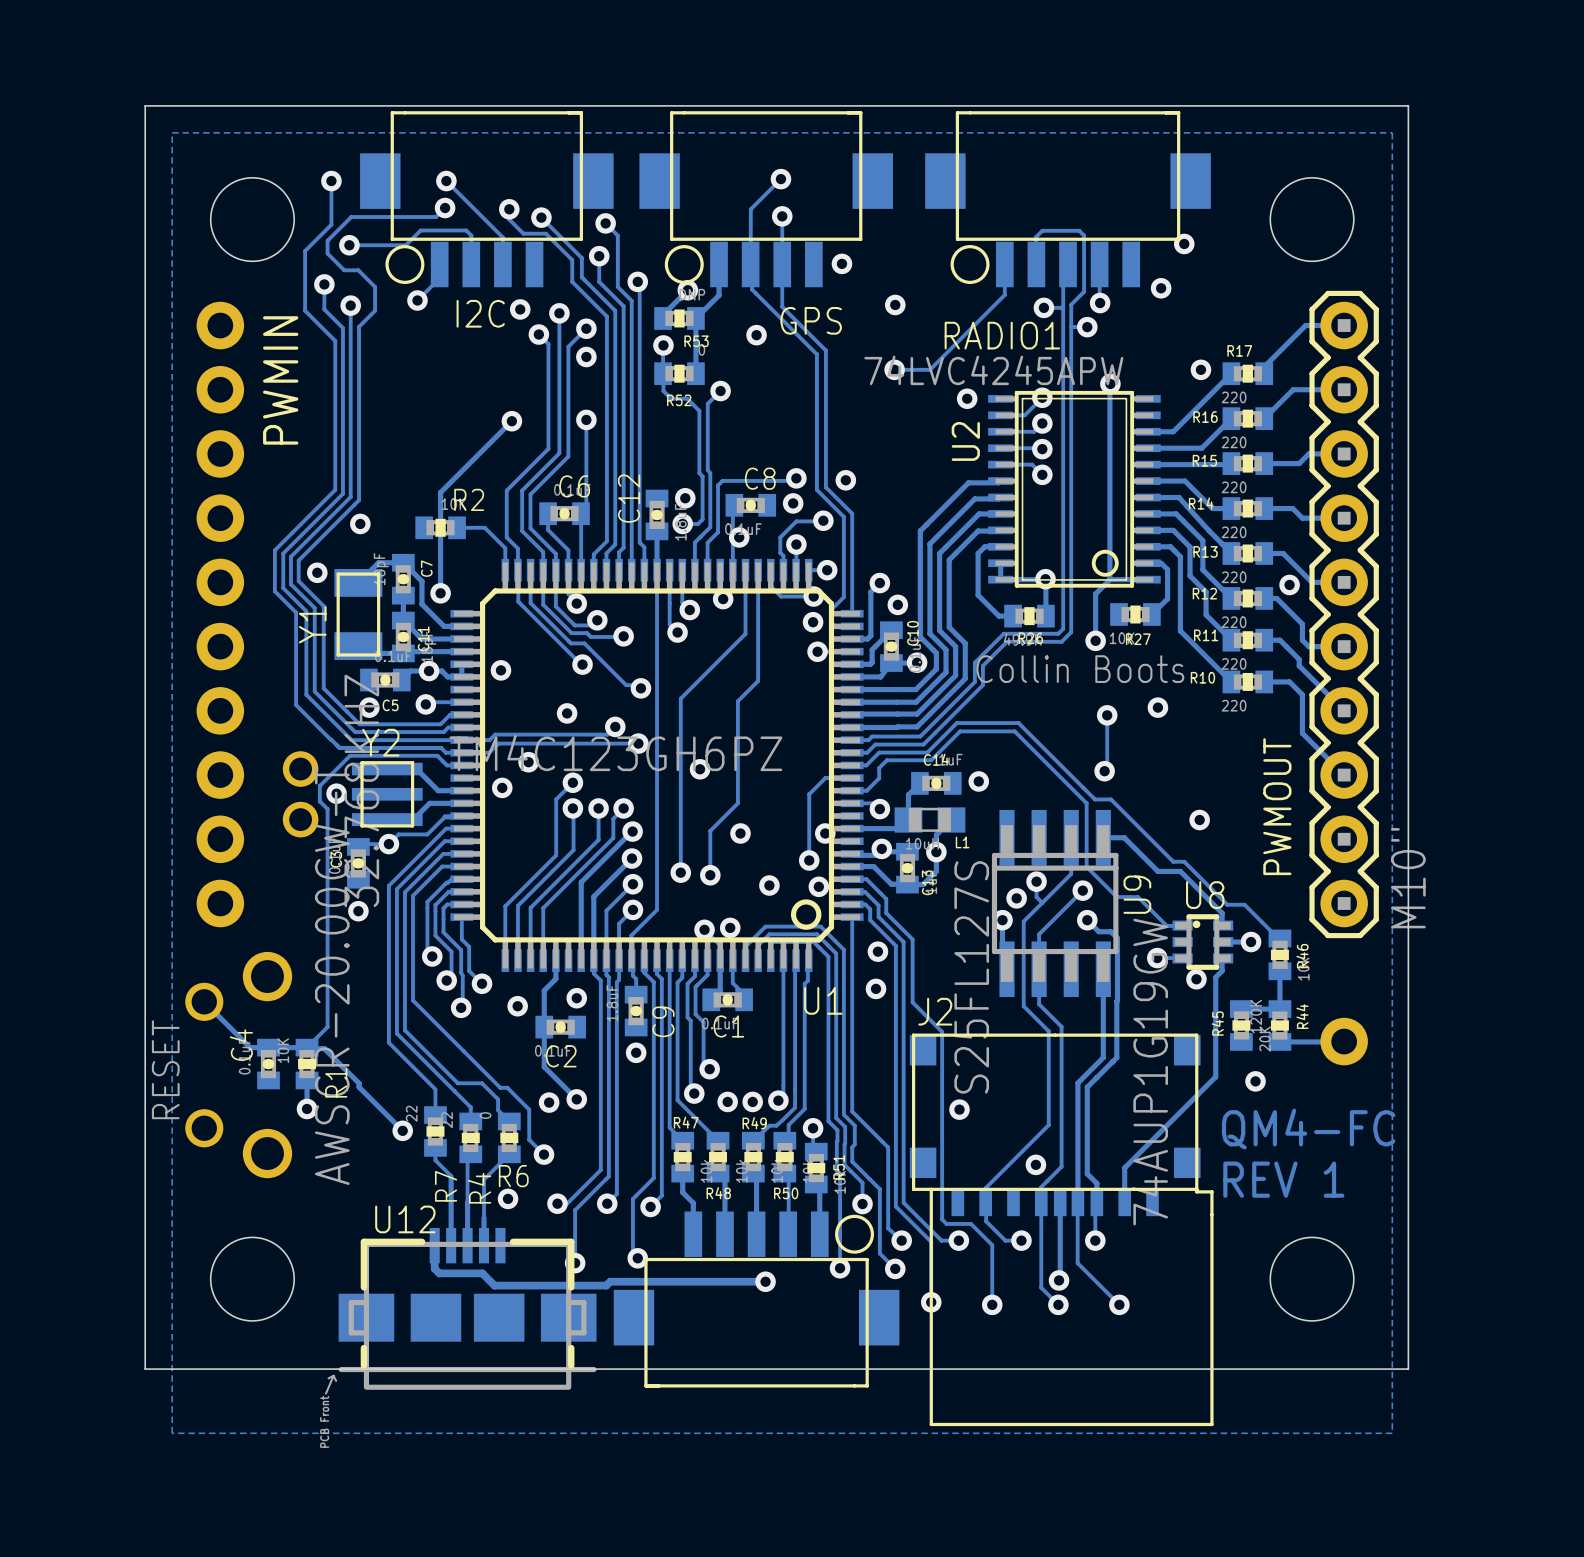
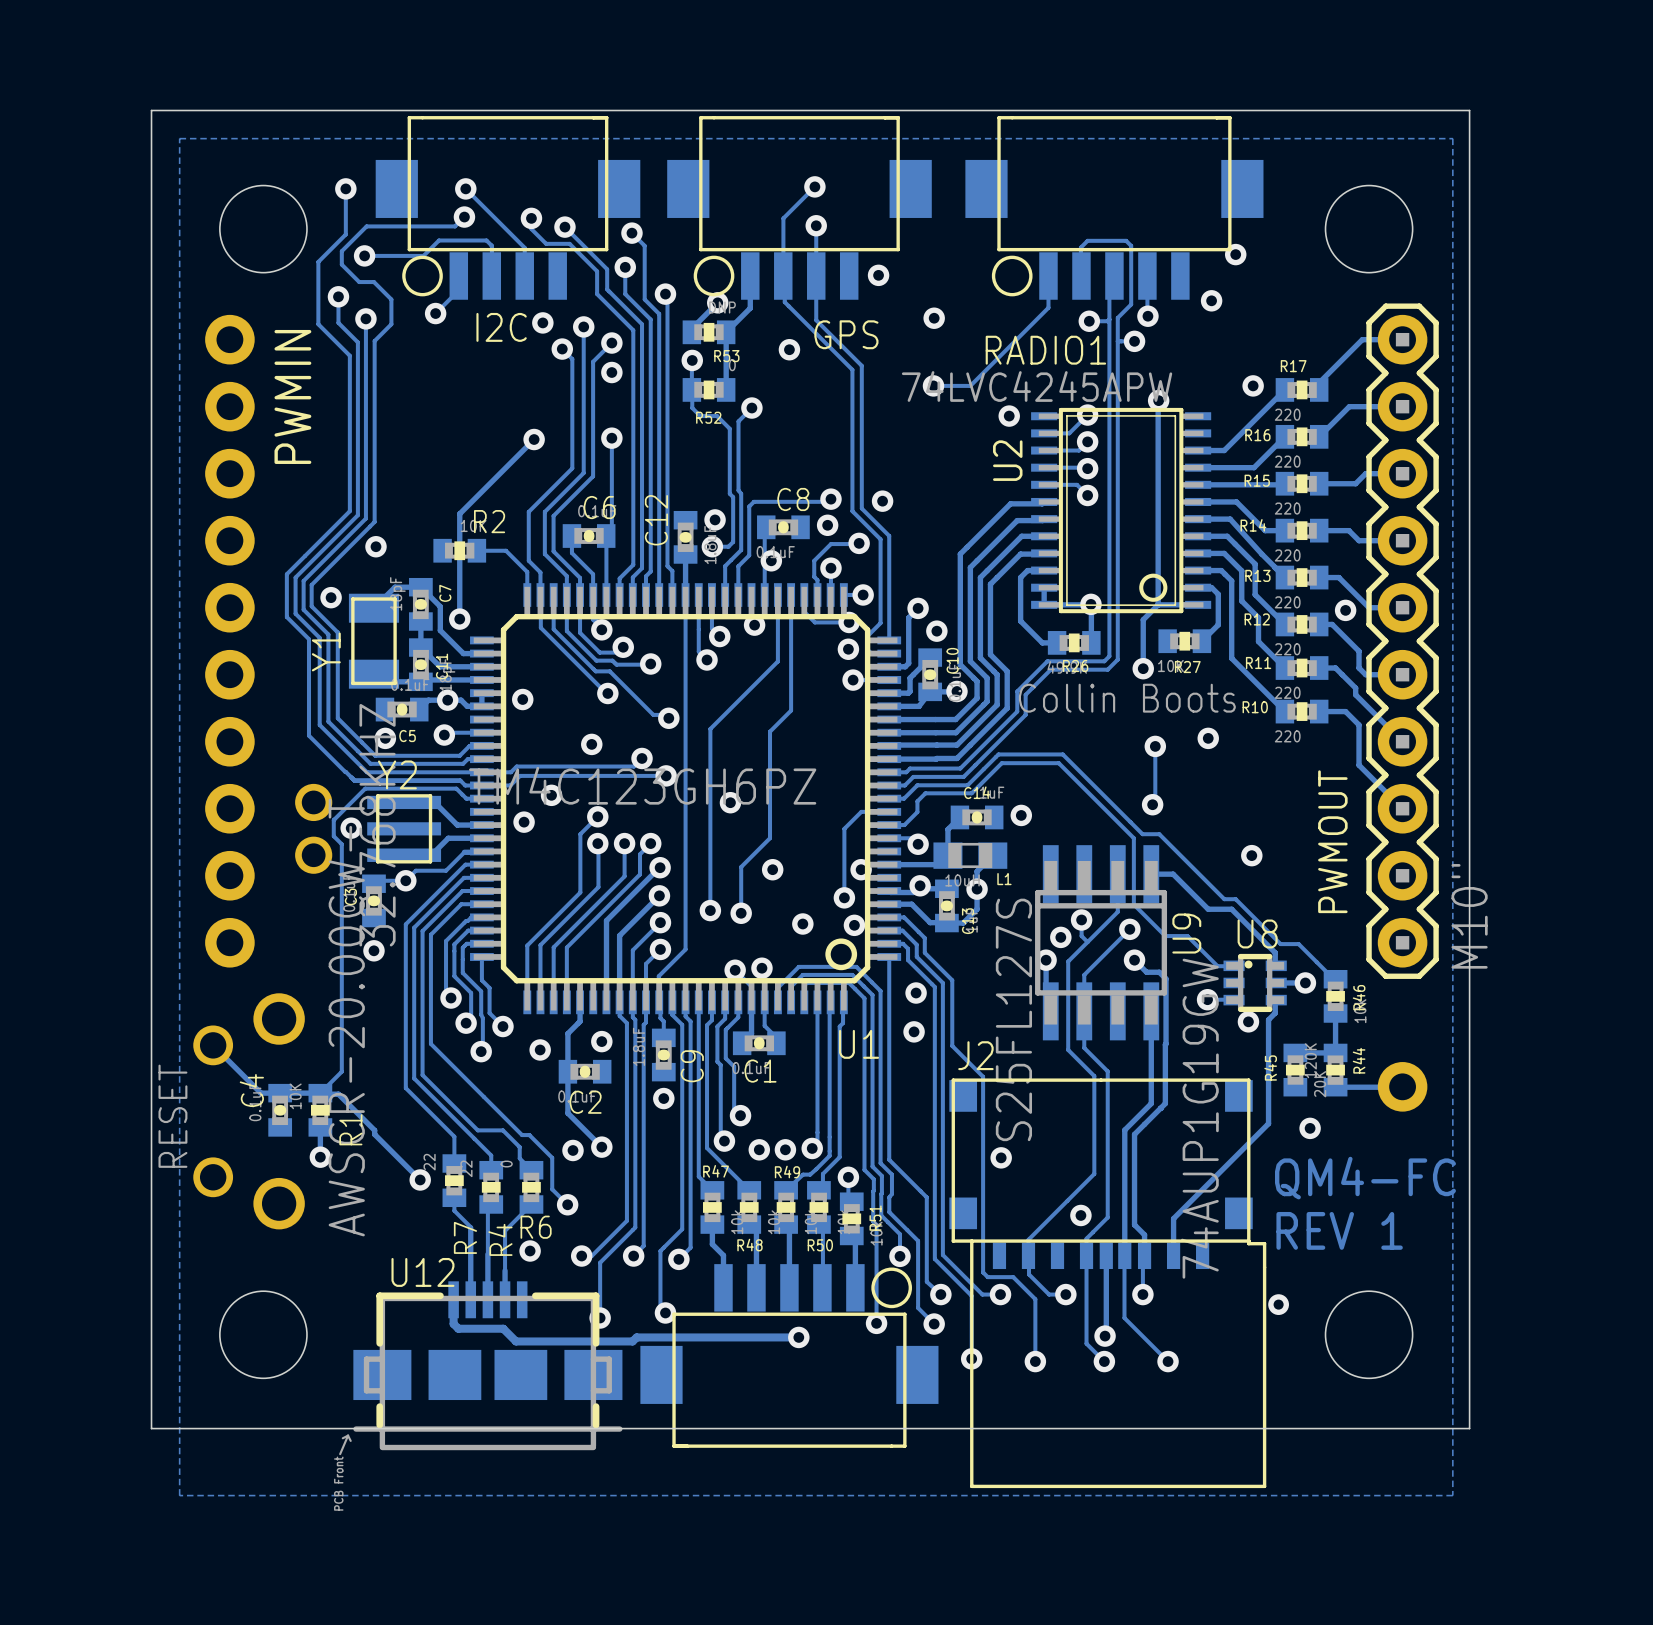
via: none -> (1278, 1304)

